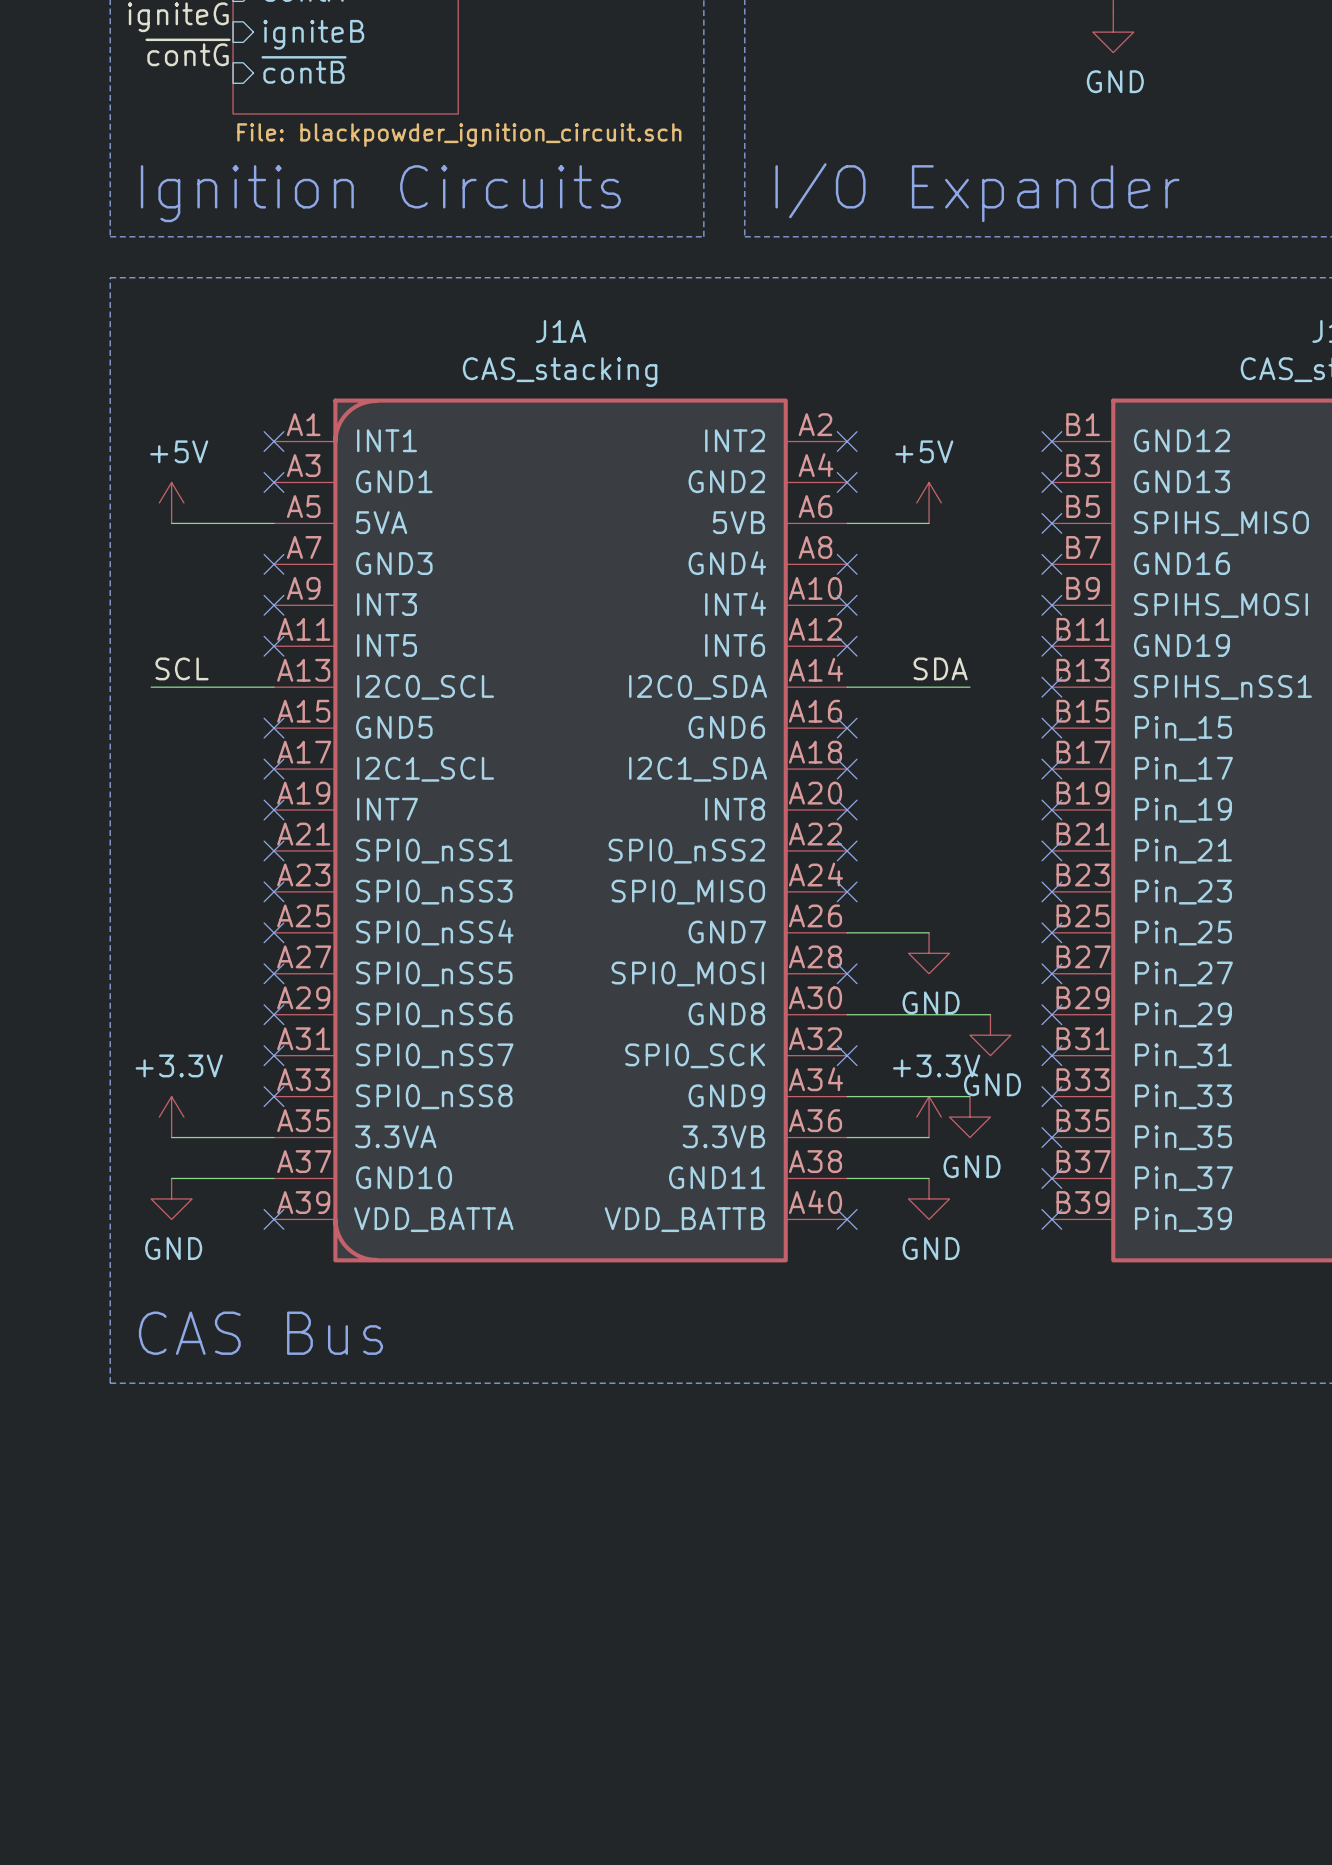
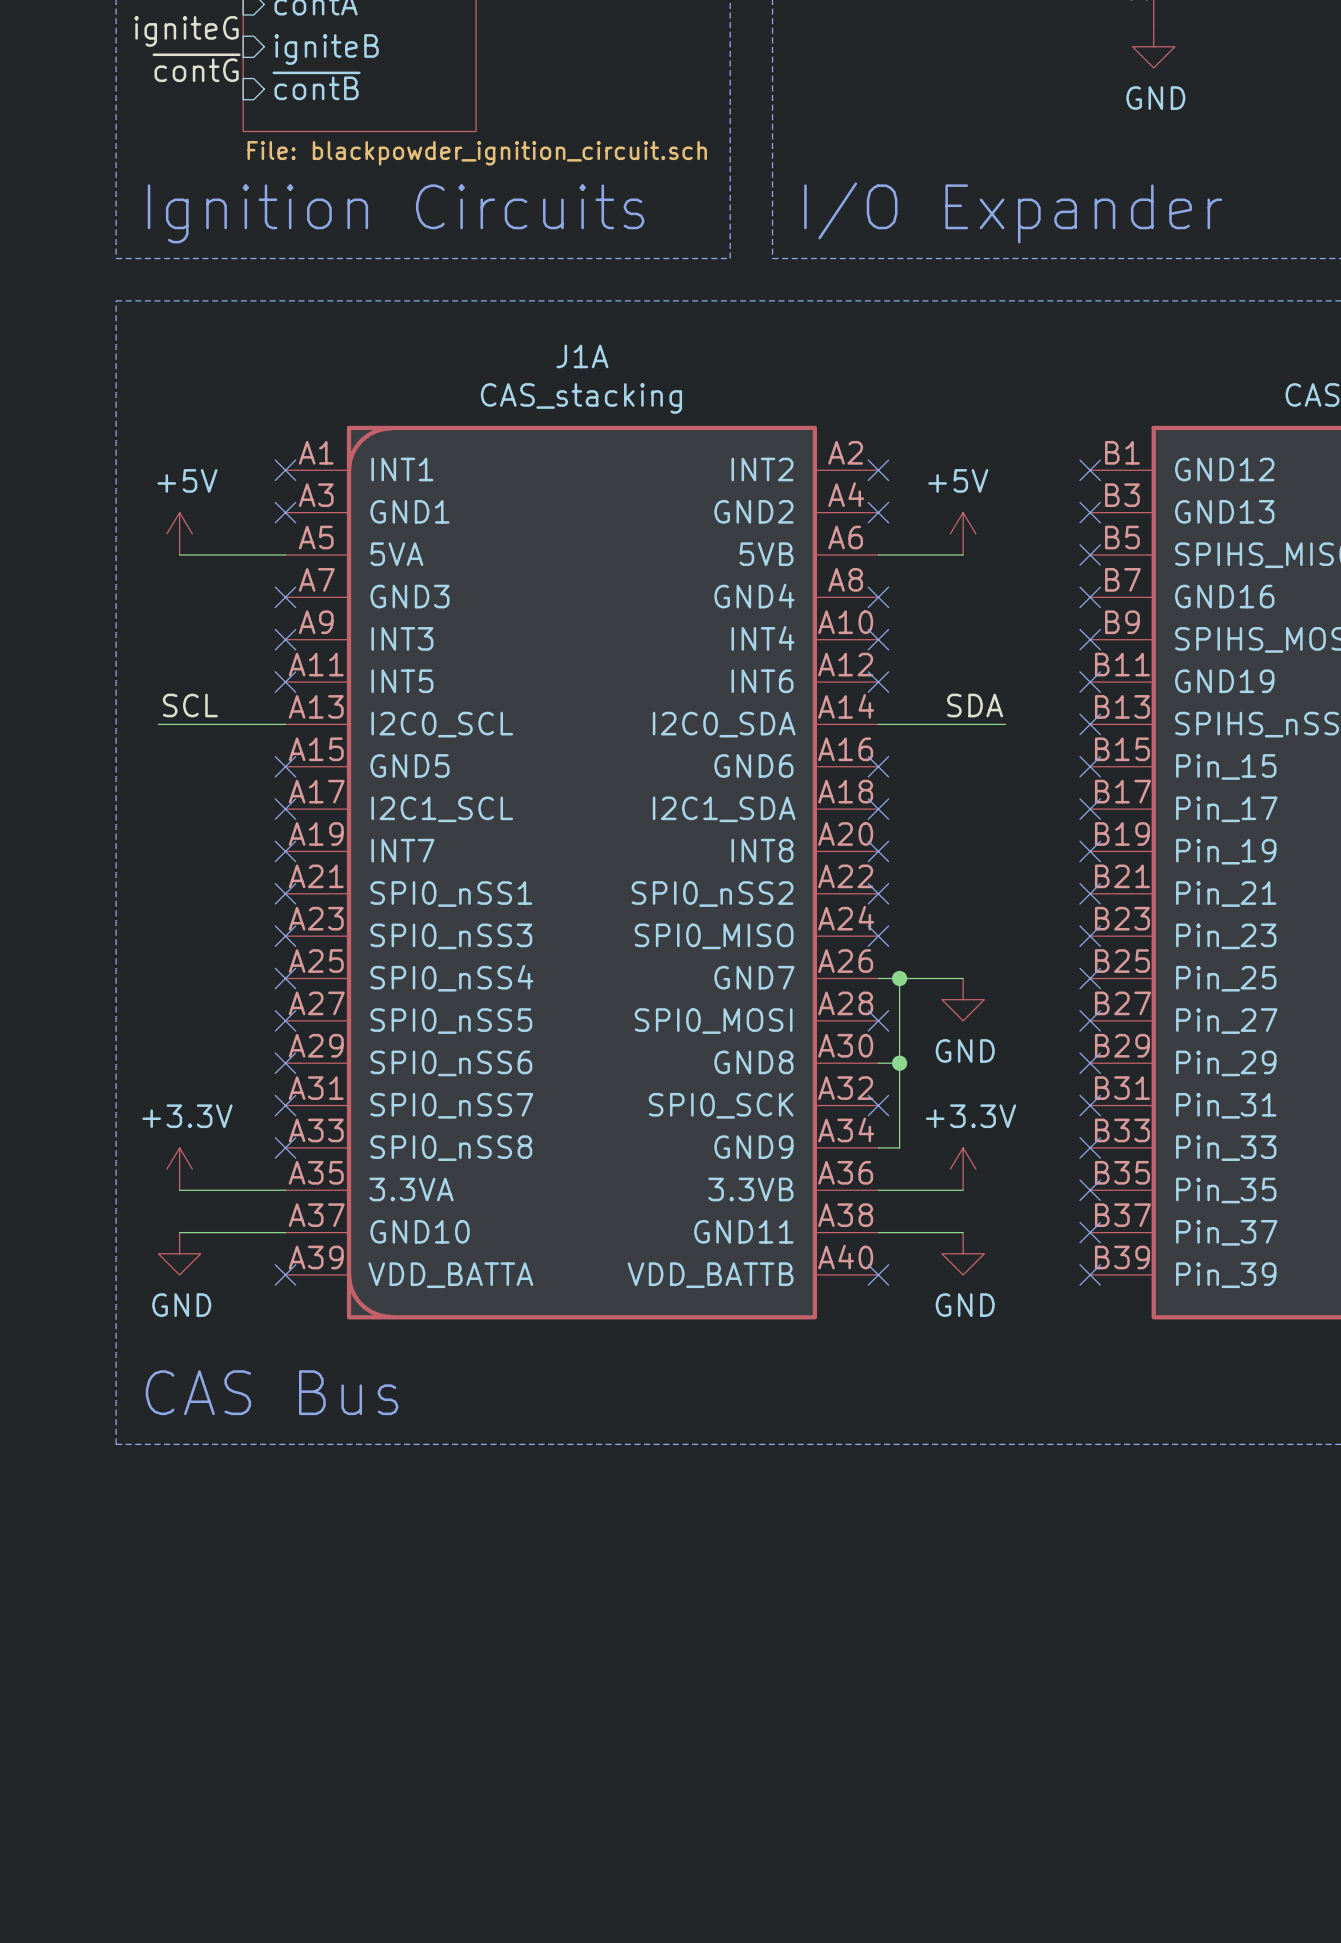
junction: none -> (899, 978)
wire: (867, 1014) (990, 1014) -> none
junction: none -> (899, 1063)
power symbol: GND (990, 1035) -> none
wire: (867, 1096) (969, 1096) -> (899, 1147) (899, 978)
power symbol: GND (969, 1117) -> none

